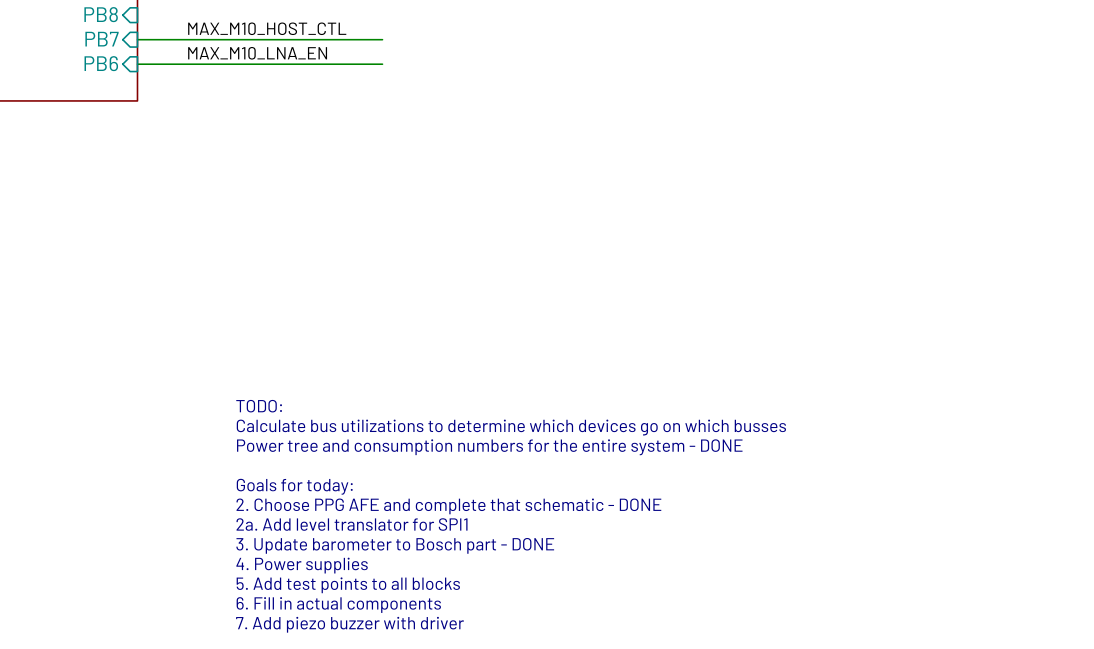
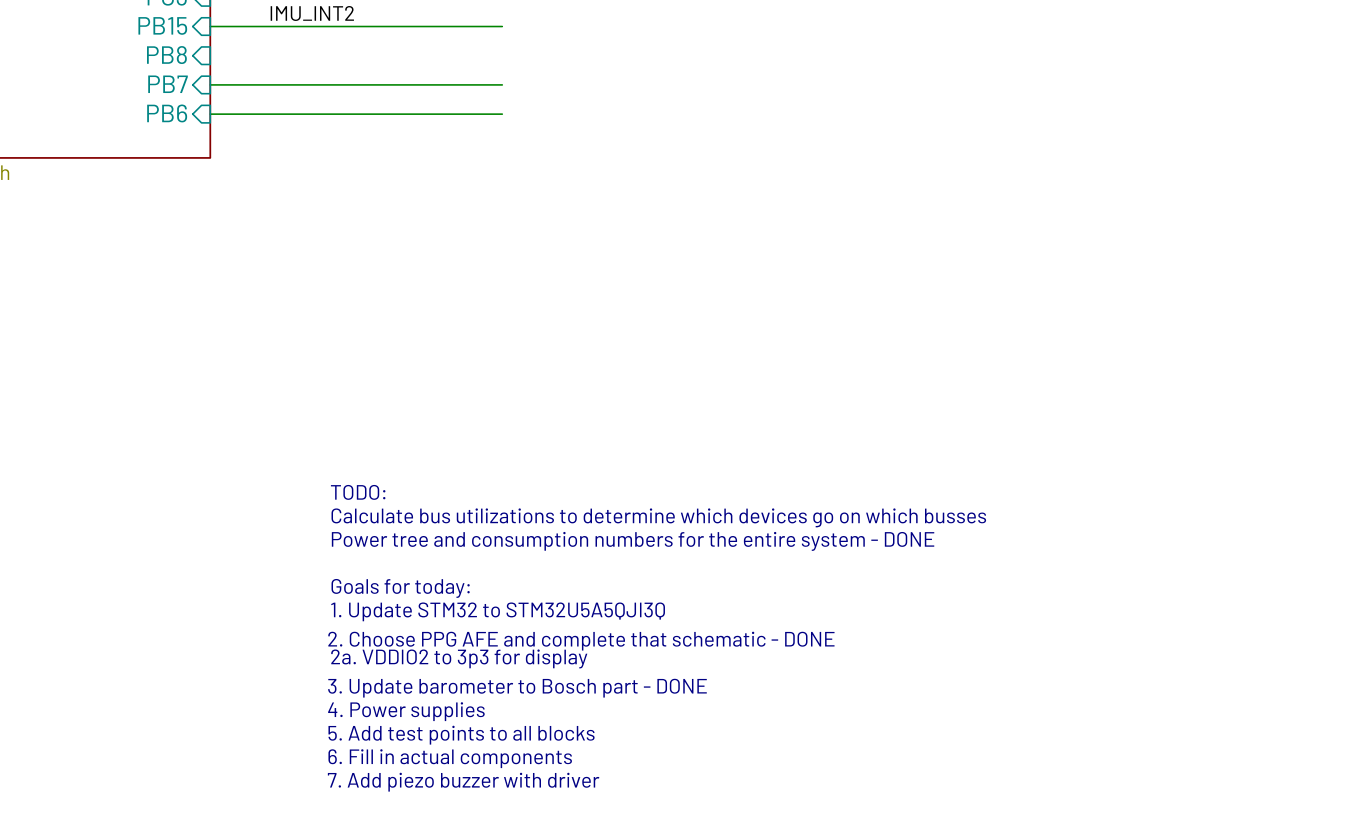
label: MAX_M10_HOST_CTL (267, 28) -> none
label: MAX_M10_LNA_EN (257, 53) -> none
text position: TODO: (259, 406) -> TODO: (358, 492)
text position: Calculate bus utilizations to determine which devices go on which busses (511, 427) -> Calculate bus utilizations to determine which devices go on which busses (658, 517)
text position: Power tree and consumption numbers for the entire system - DONE (489, 447) -> Power tree and consumption numbers for the entire system - DONE (633, 541)
text: none -> 1. Update STM32 to STM32U5A5QJI3Q (498, 611)
text position: Goals for today: (294, 486) -> Goals for today: (400, 588)
text: 2a. Add level translator for SPI1 (352, 524) -> 2a. VDDIO2 to 3p3 for display (459, 658)

